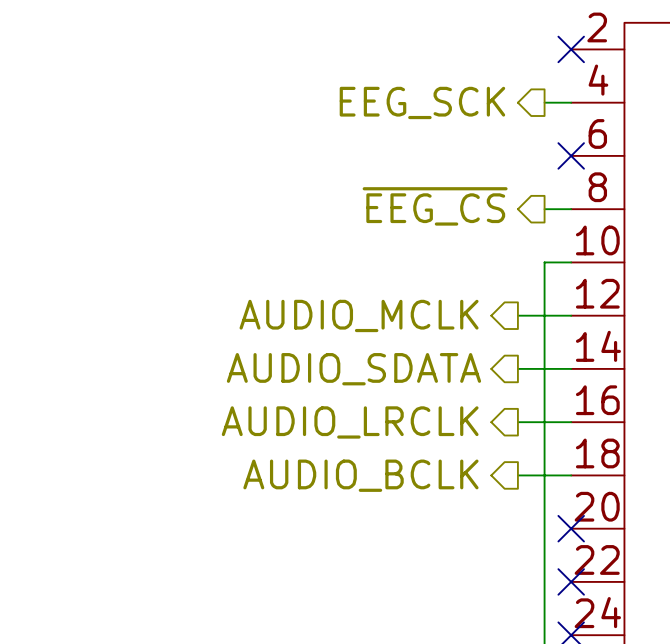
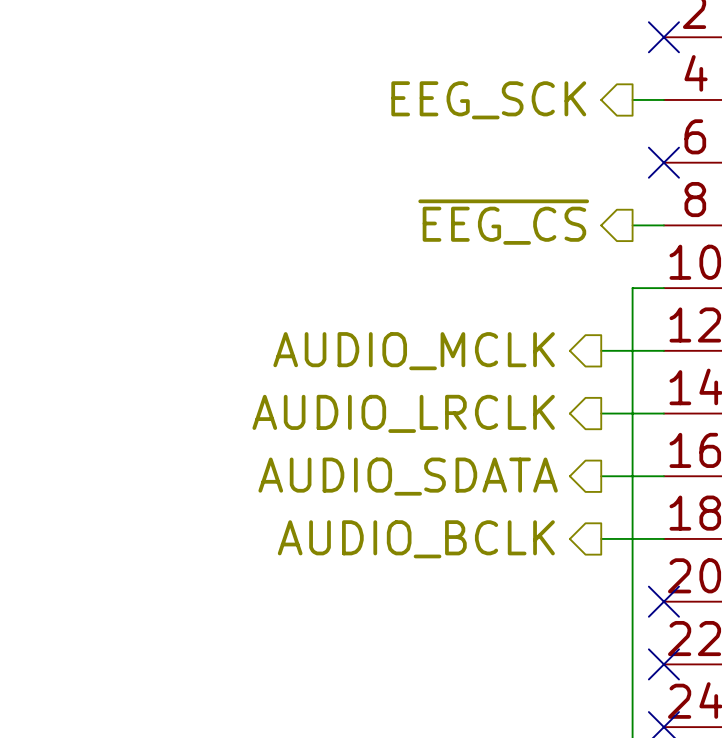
hierarchical label: AUDIO_SDATA (353, 369) -> AUDIO_LRCLK (403, 413)
hierarchical label: AUDIO_LRCLK (350, 422) -> AUDIO_SDATA (408, 476)

